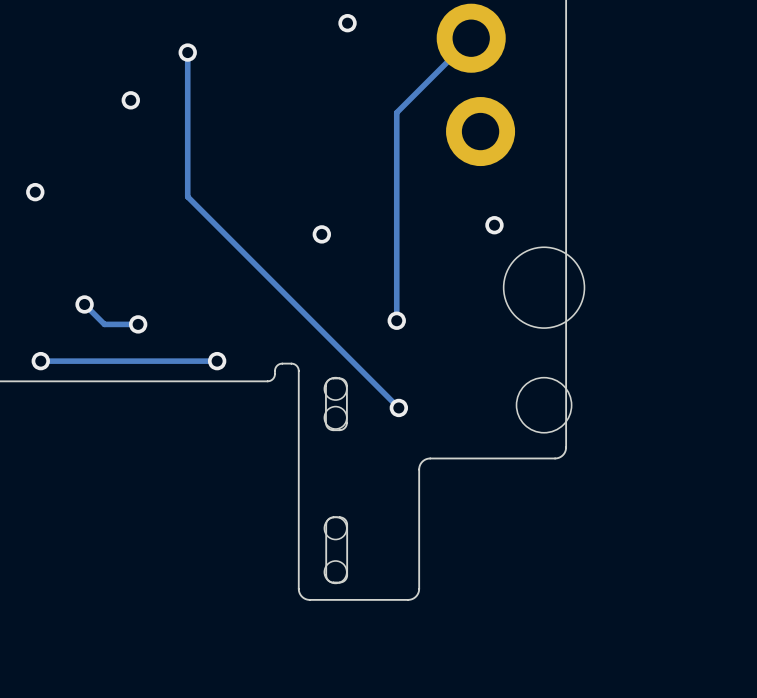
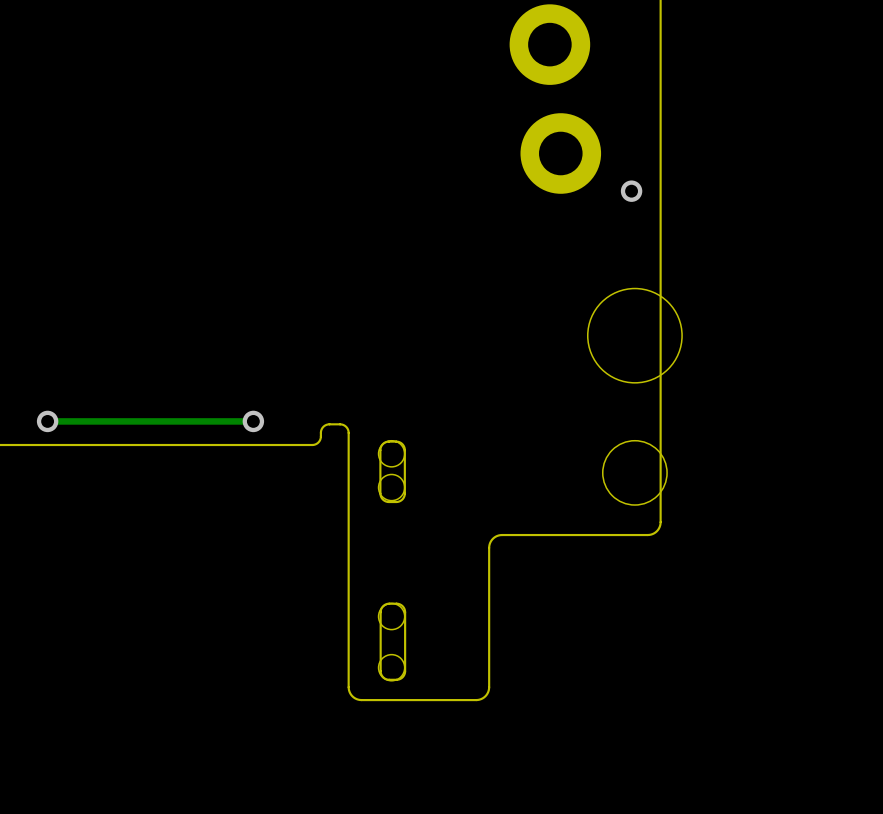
via: (347, 23) -> none
track: (471, 38) (396, 112) (396, 320) -> none
track: (187, 52) (187, 196) (398, 407) -> none
via: (187, 52) -> none
via: (130, 100) -> none
via: (35, 192) -> none
via position: (494, 225) -> (631, 191)
via: (321, 234) -> none
track: (84, 304) (104, 324) (138, 324) -> none
via: (84, 304) -> none
via: (396, 320) -> none
via: (138, 324) -> none
via: (398, 407) -> none

